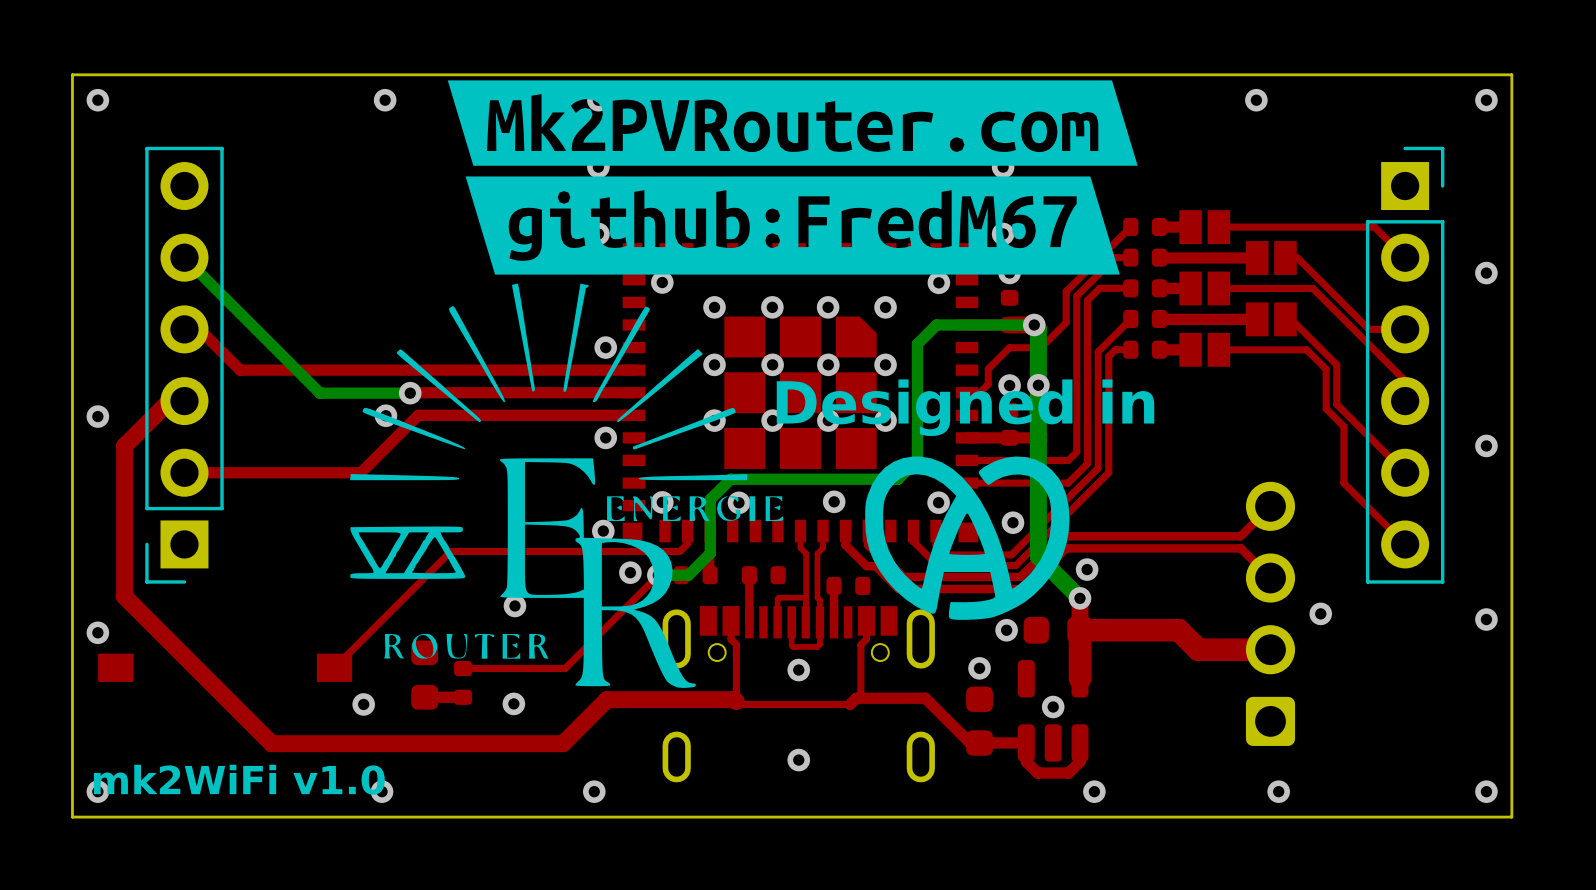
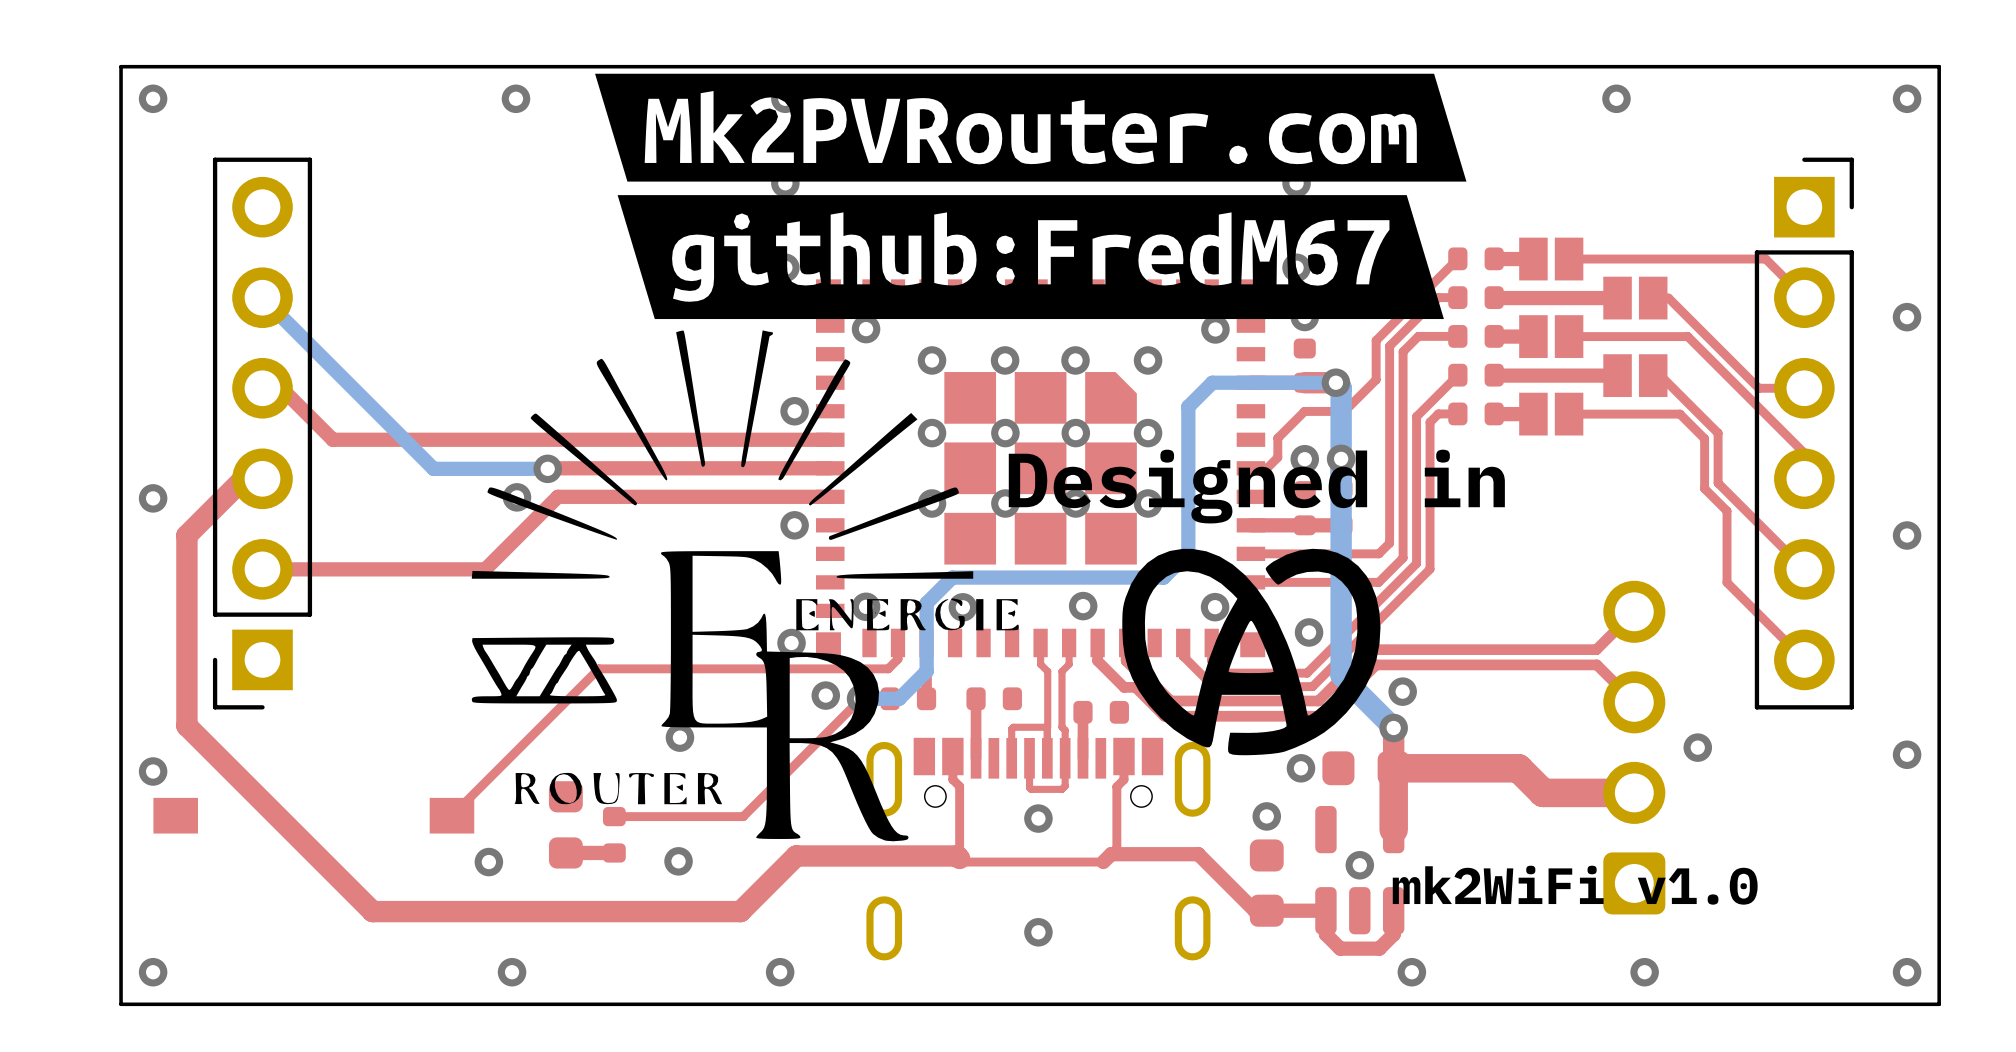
text: none -> mk2WiFi v1.0 (1575, 885)
text: mk2WiFi v1.0 (239, 779) -> none

